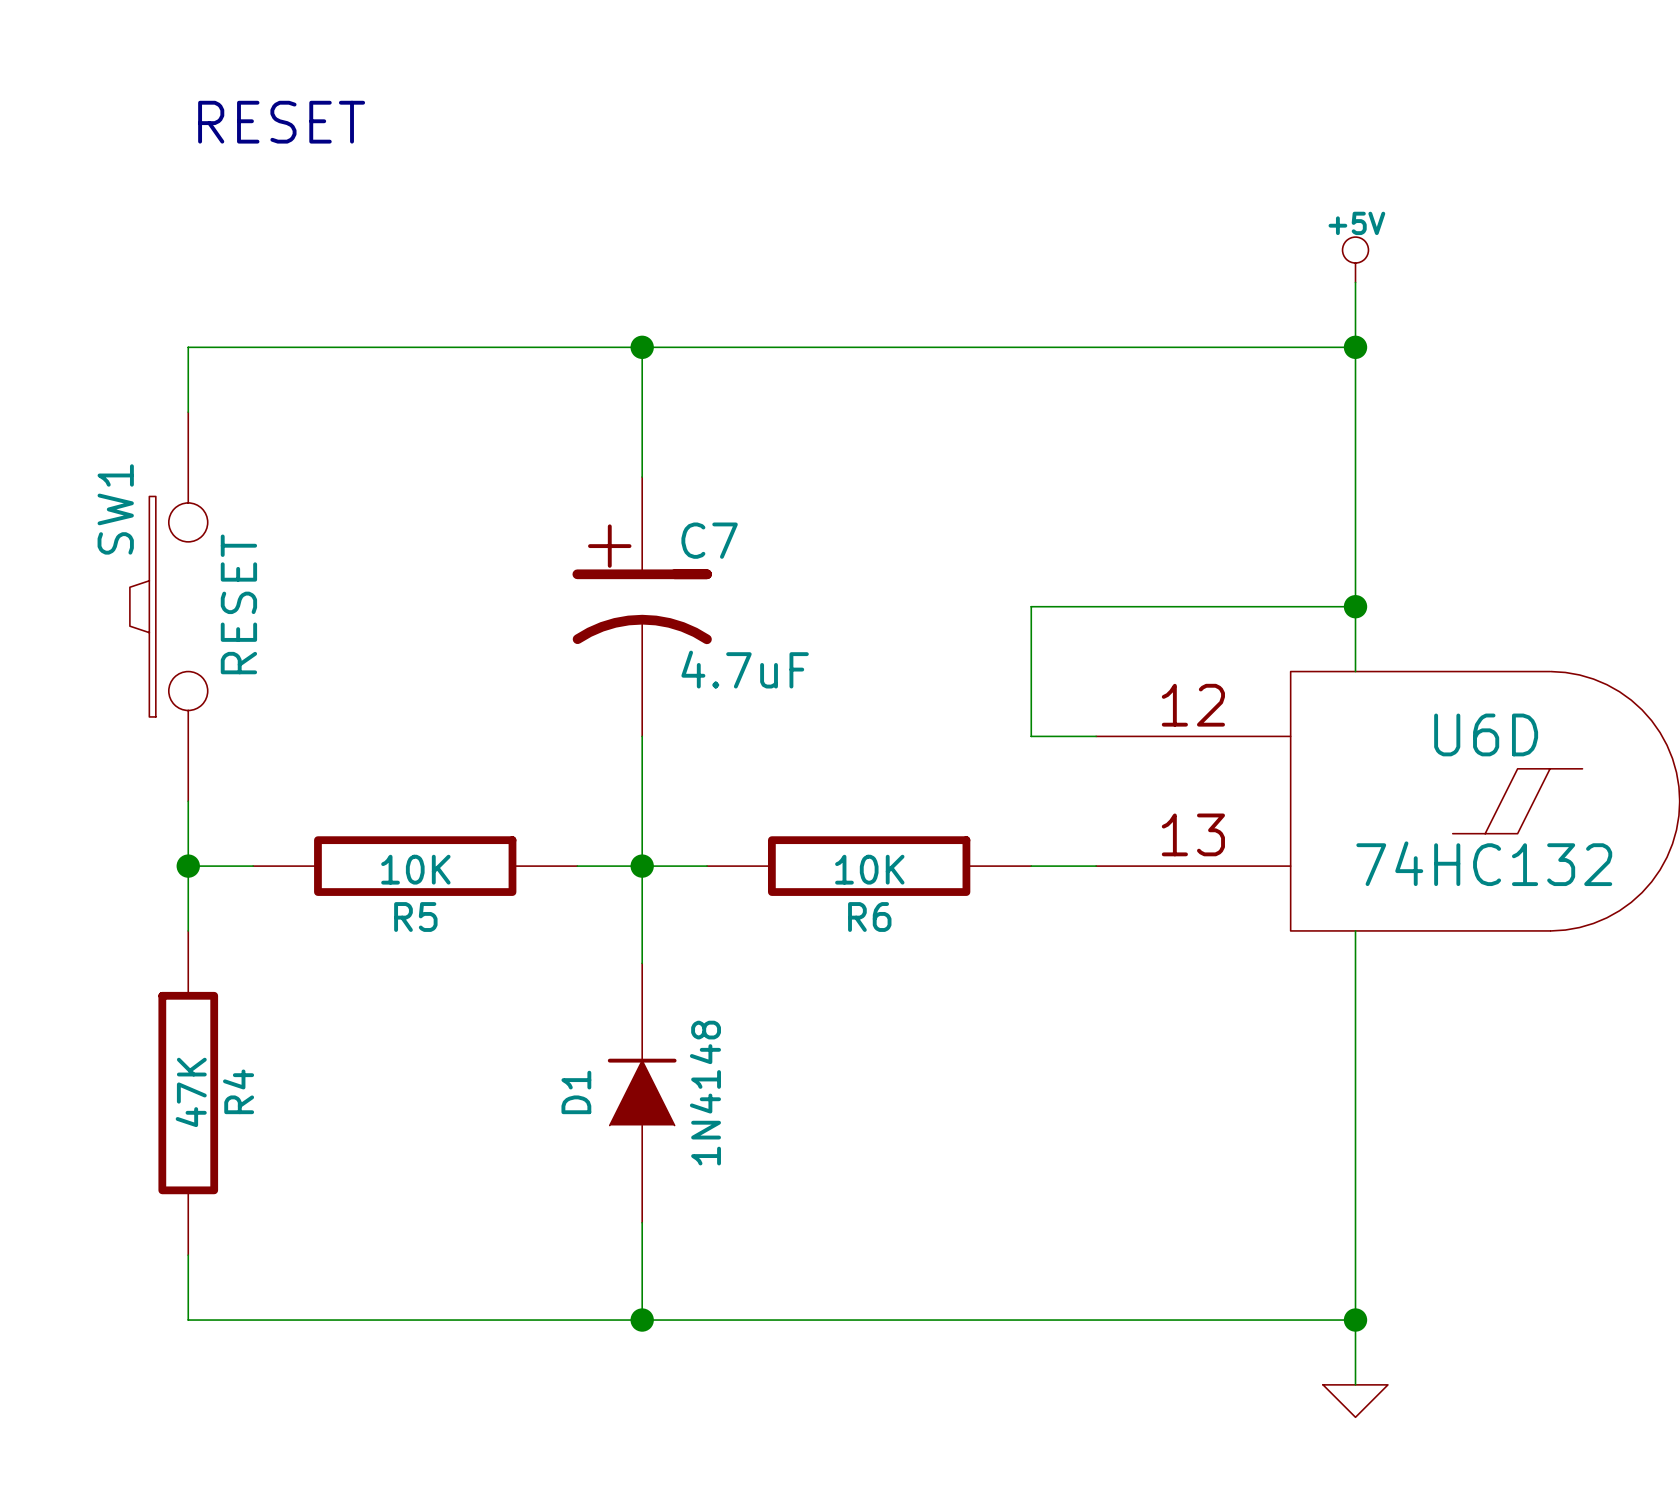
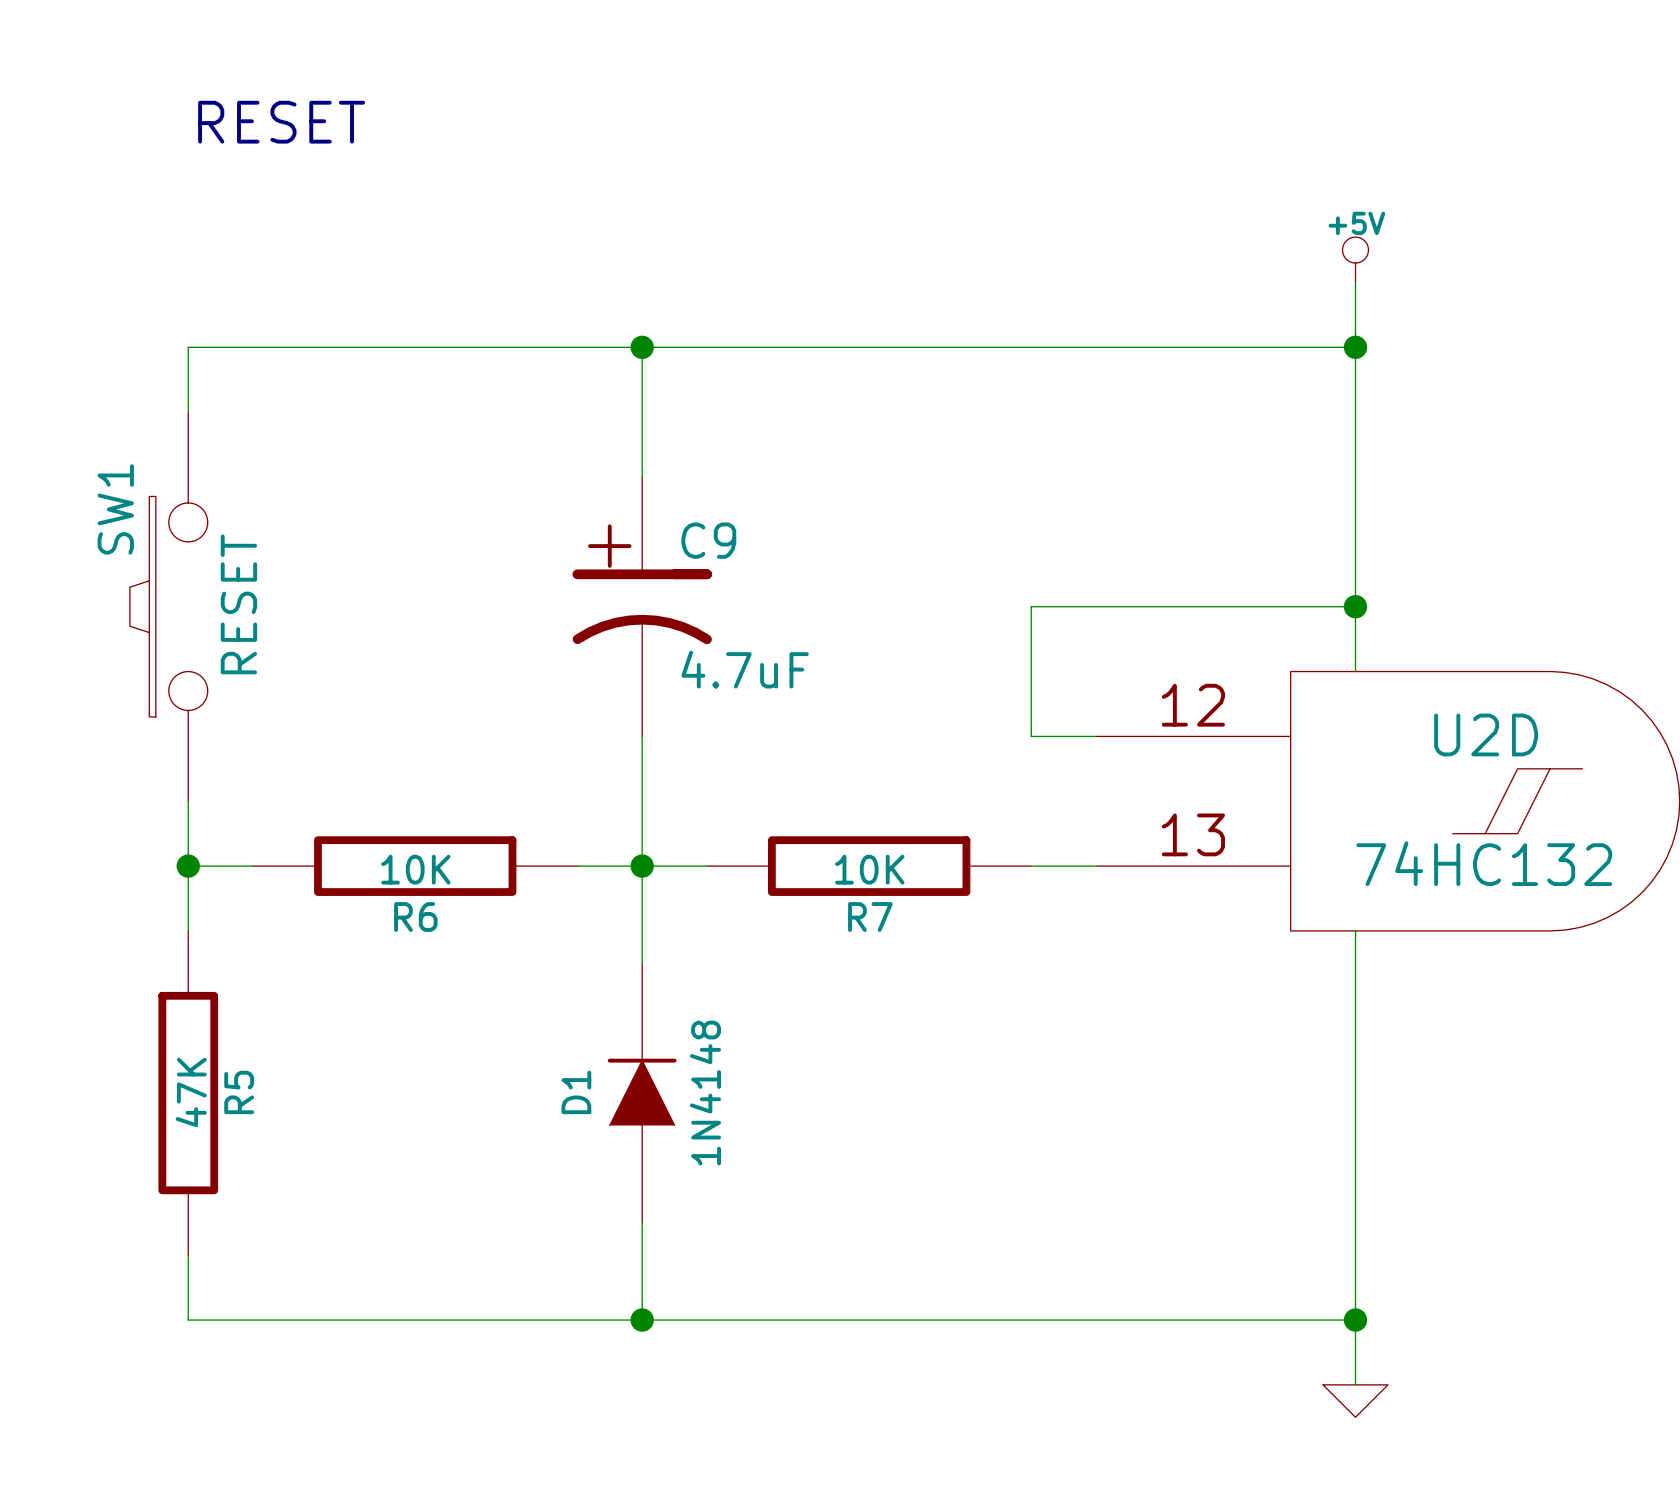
C7 name: C7 (709, 540) -> C9 (708, 540)
U6D name: U6D (1486, 734) -> U2D (1486, 734)
R5 name: R5 (415, 917) -> R6 (415, 917)
R6 name: R6 (869, 917) -> R7 (870, 917)
R4 name: R4 (238, 1091) -> R5 (239, 1092)

